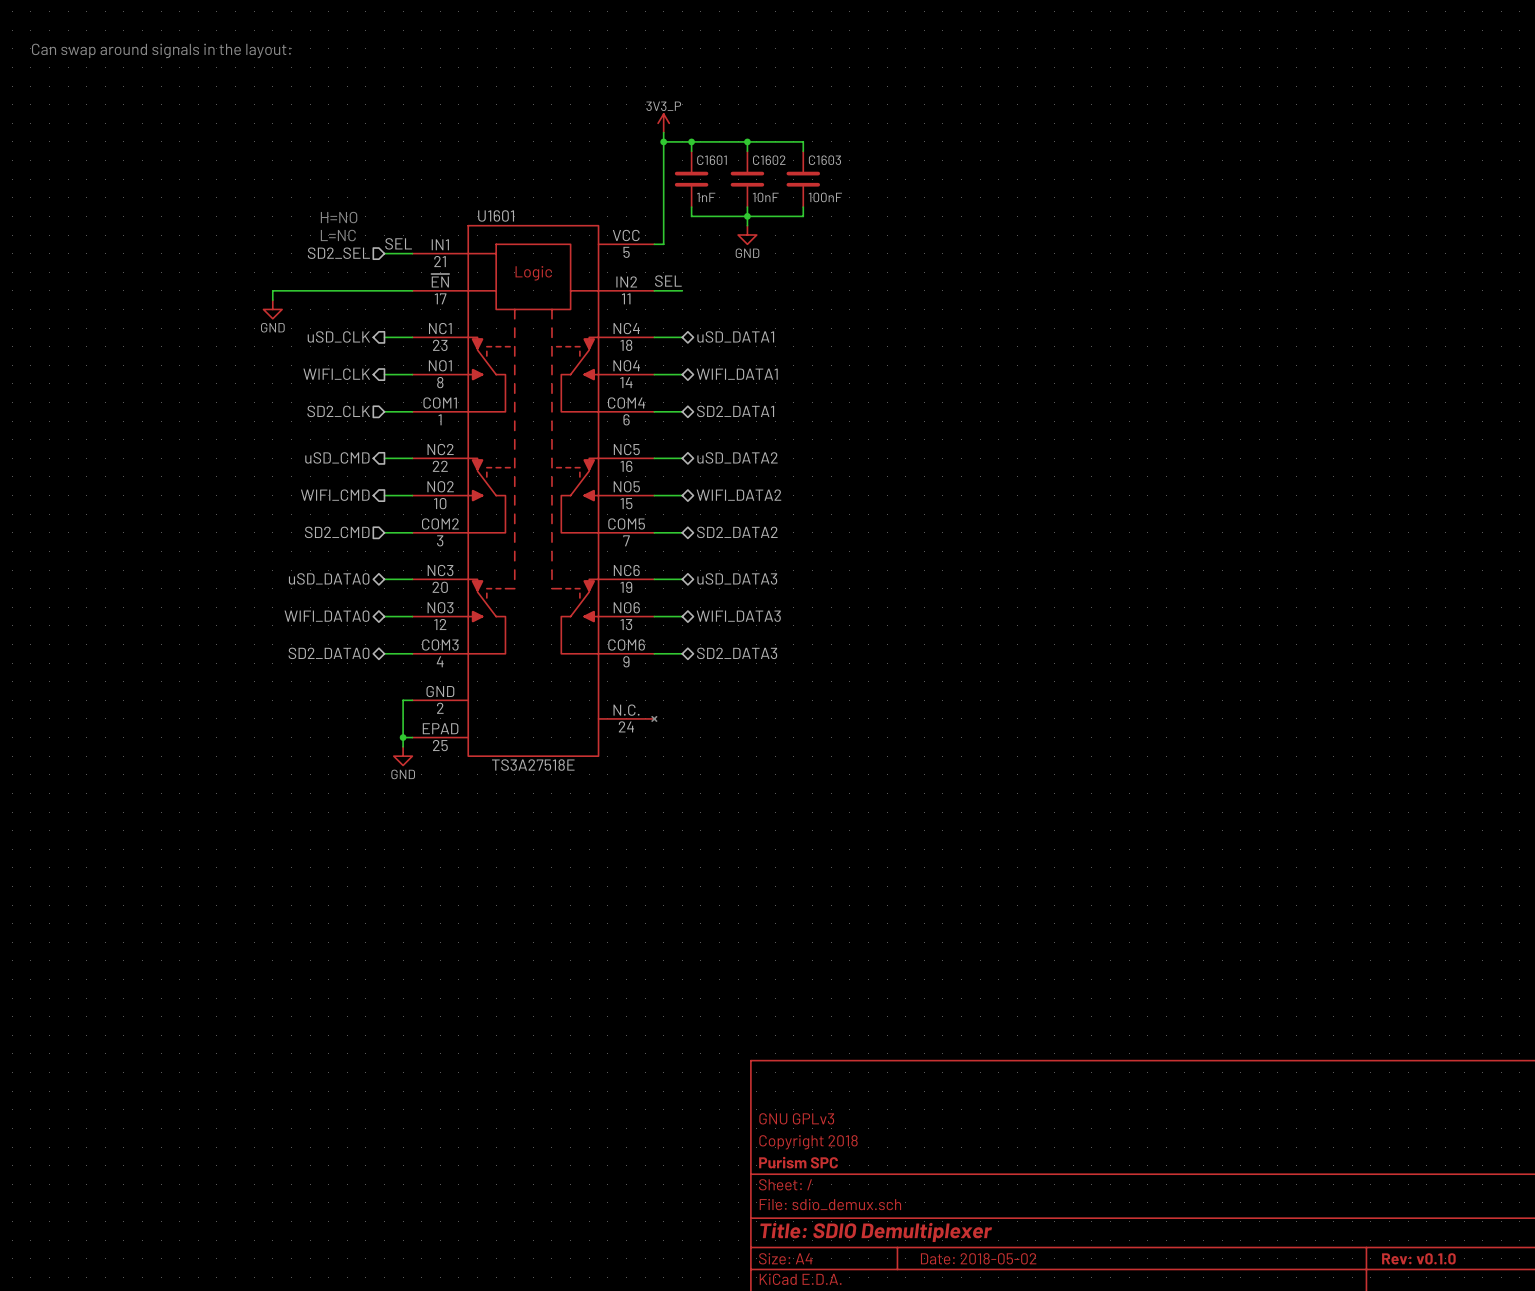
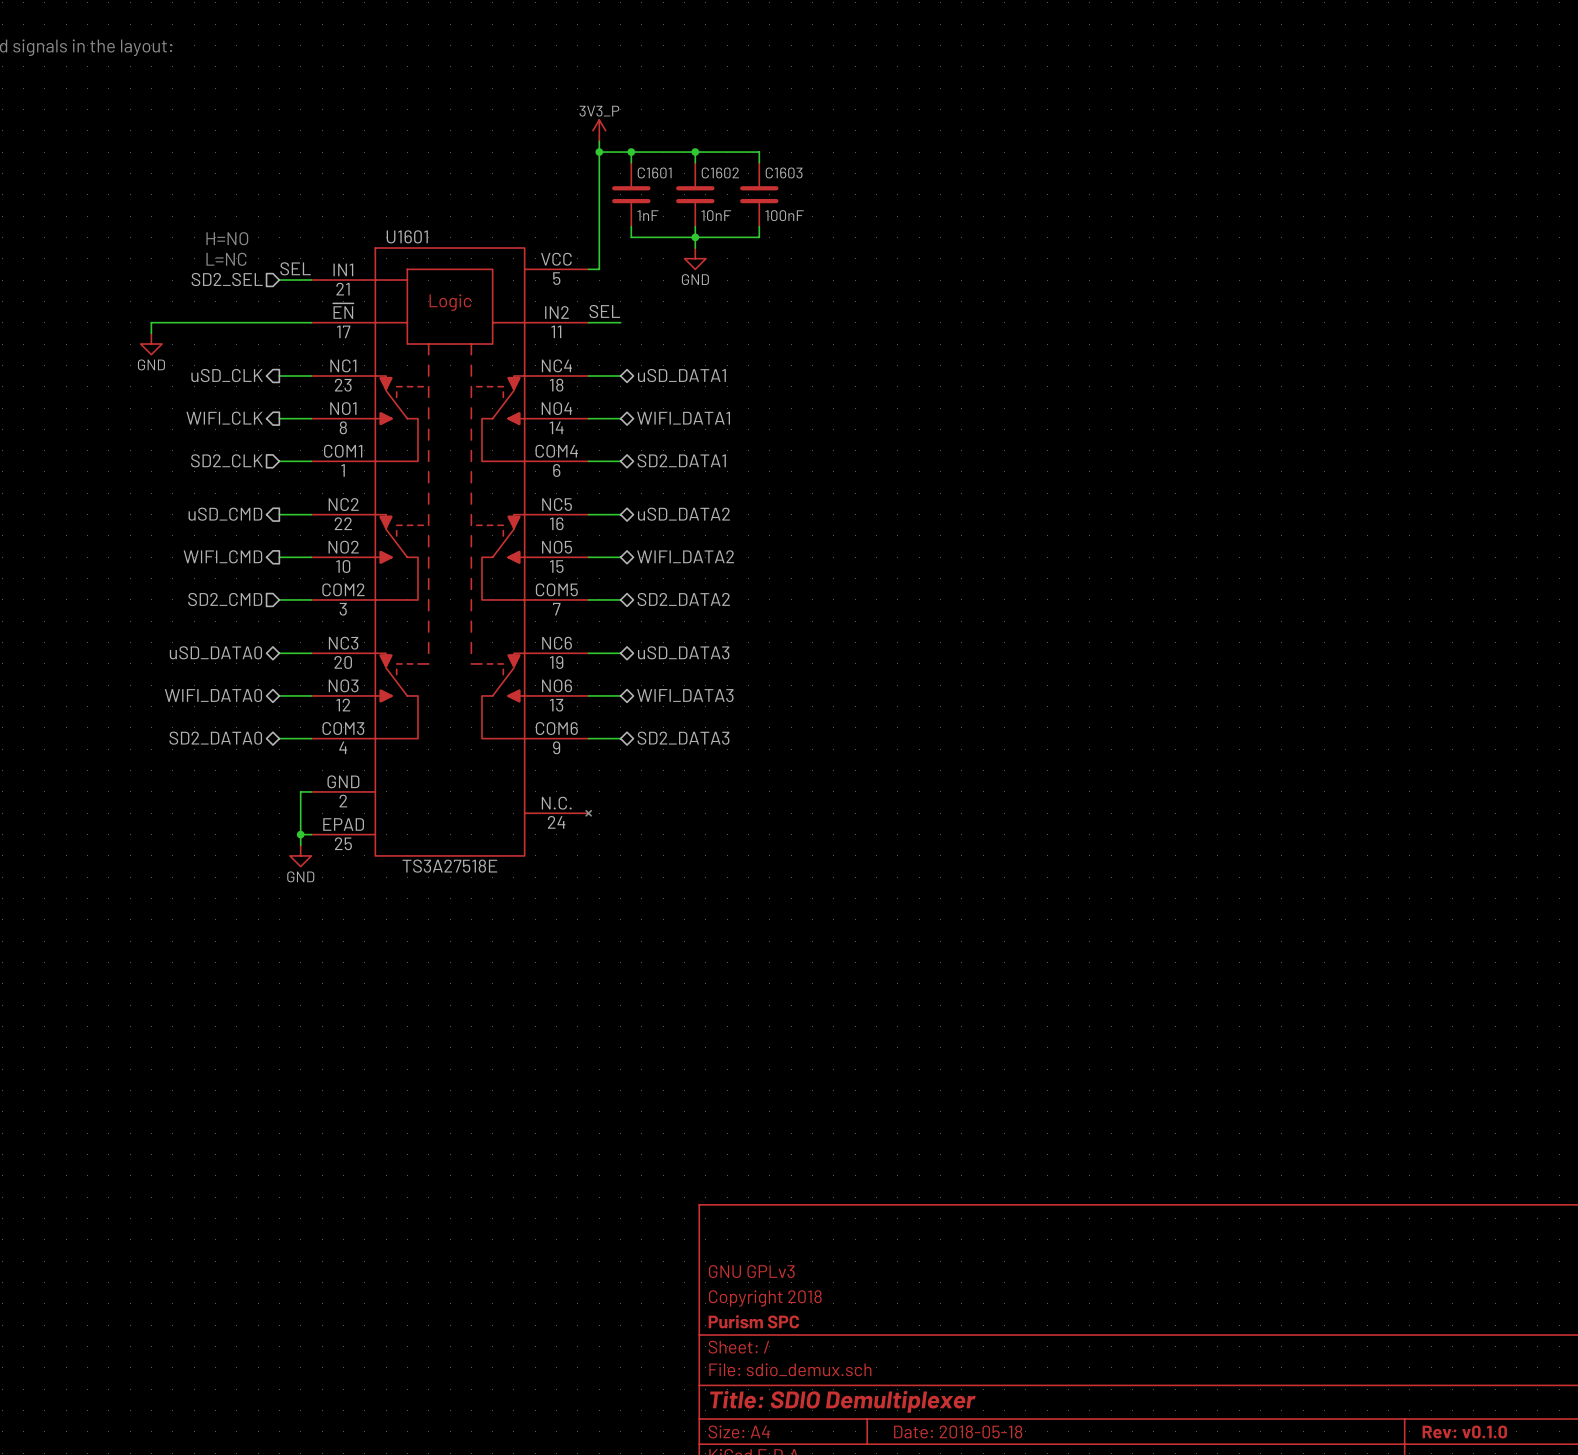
title block: Date: 2018-05-02 (978, 1258) -> Date: 2018-05-18 (958, 1431)

